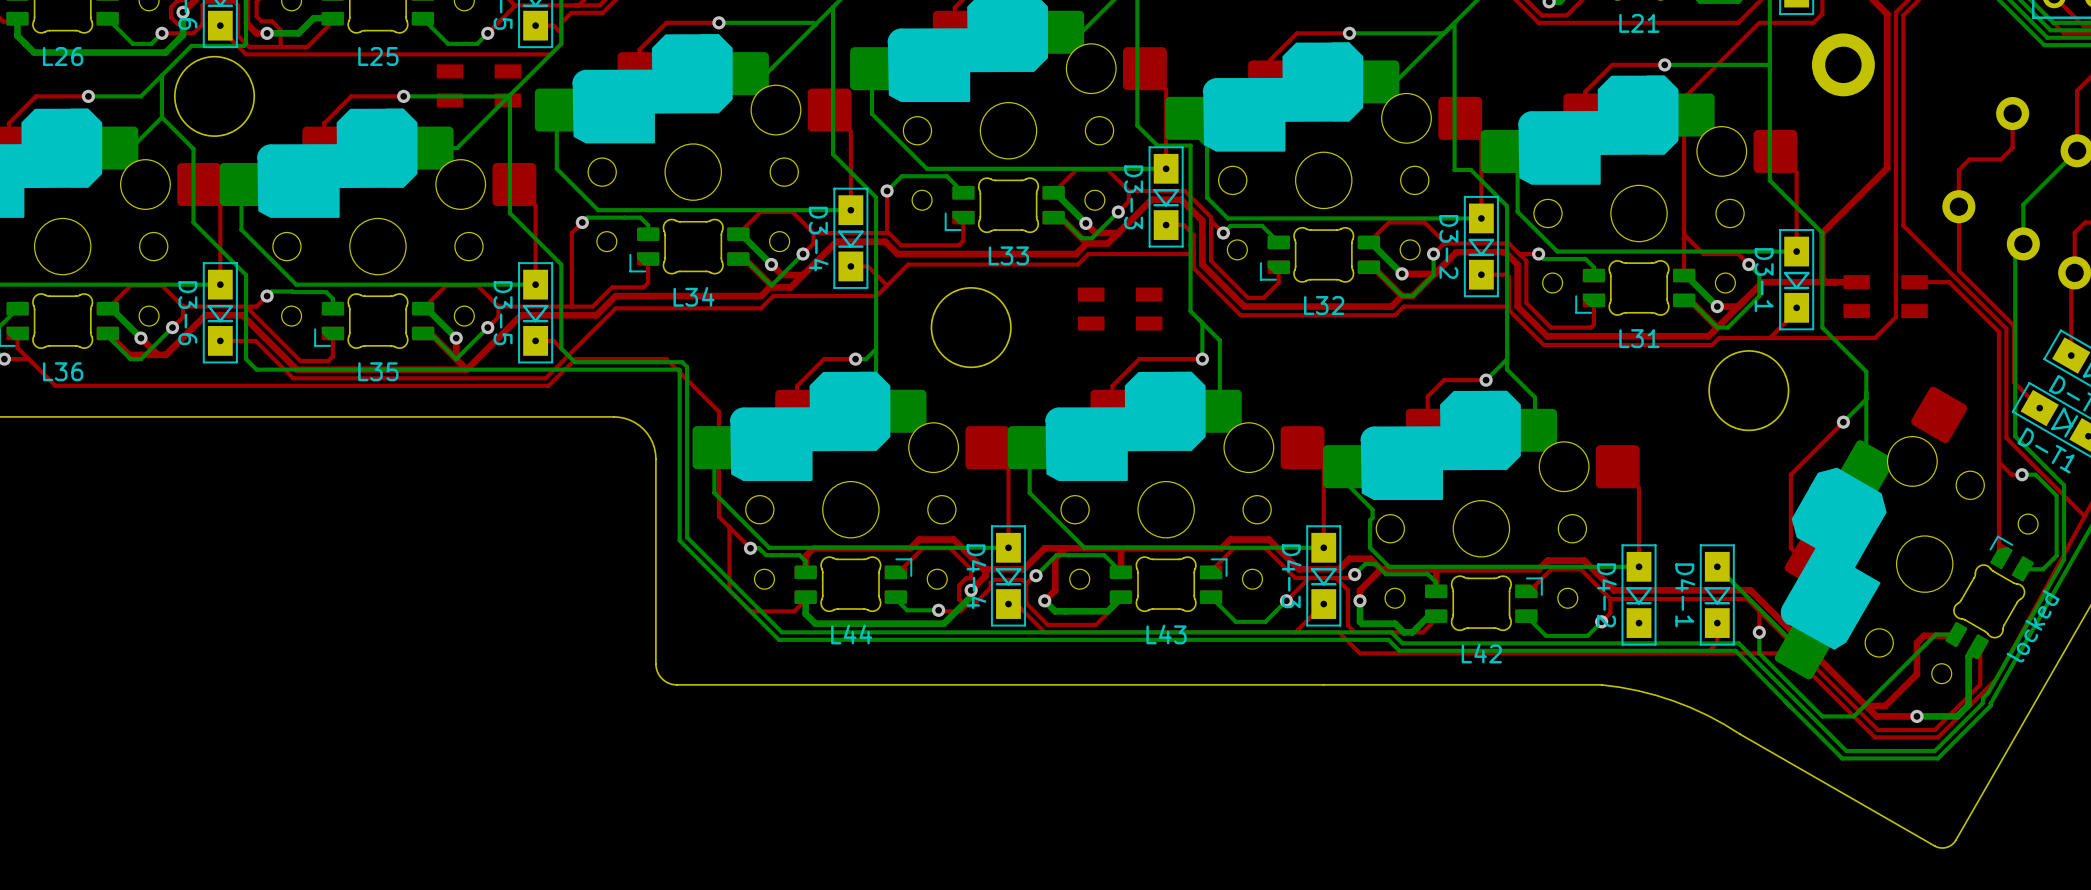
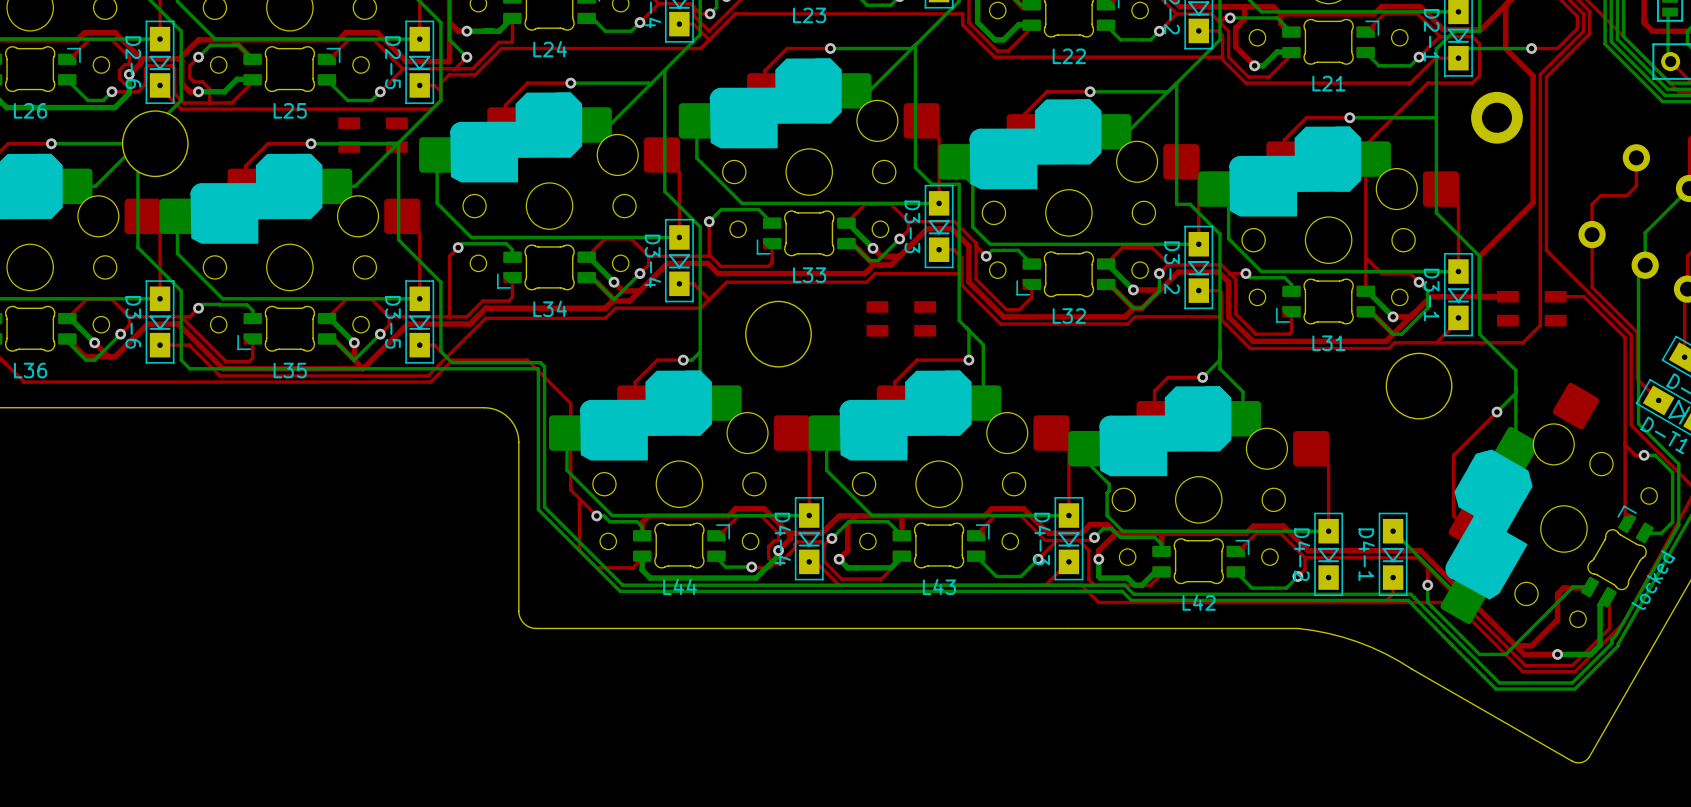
bottom track: (244, 45) (191, 45) (140, 96) -> (179, 102) (95, 186) (86, 186)
bottom track: (162, 75) (162, 117) -> none
bottom track: (162, 117) (193, 148) -> (94, 143) (137, 143) (137, 187)
bottom track: (162, 117) (131, 148) -> none

